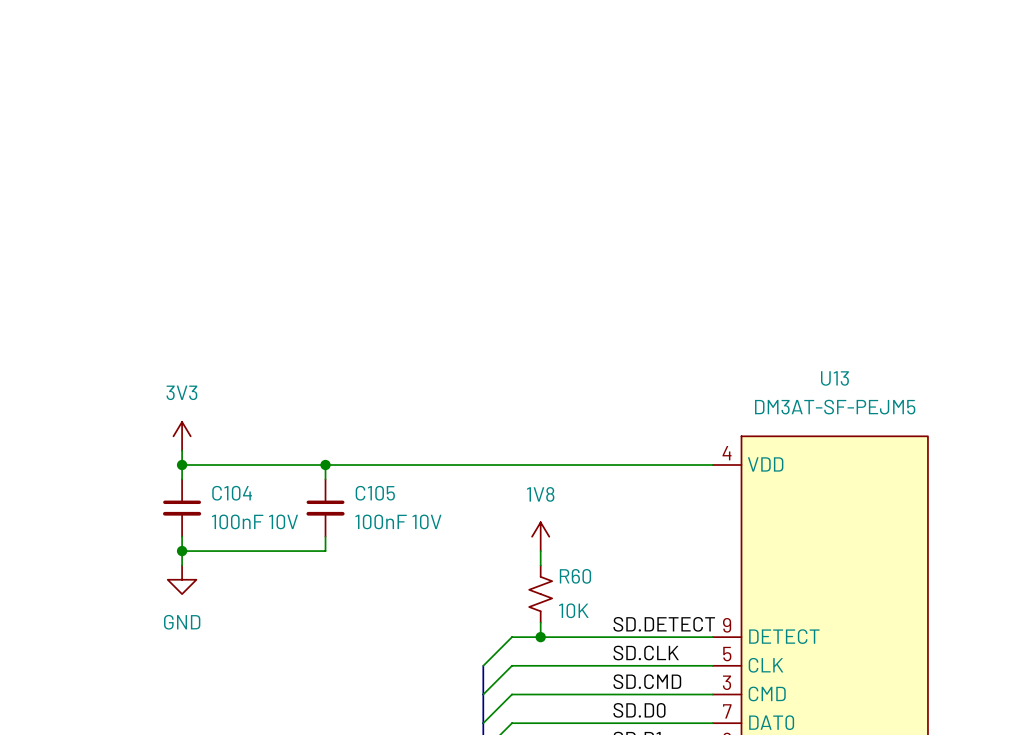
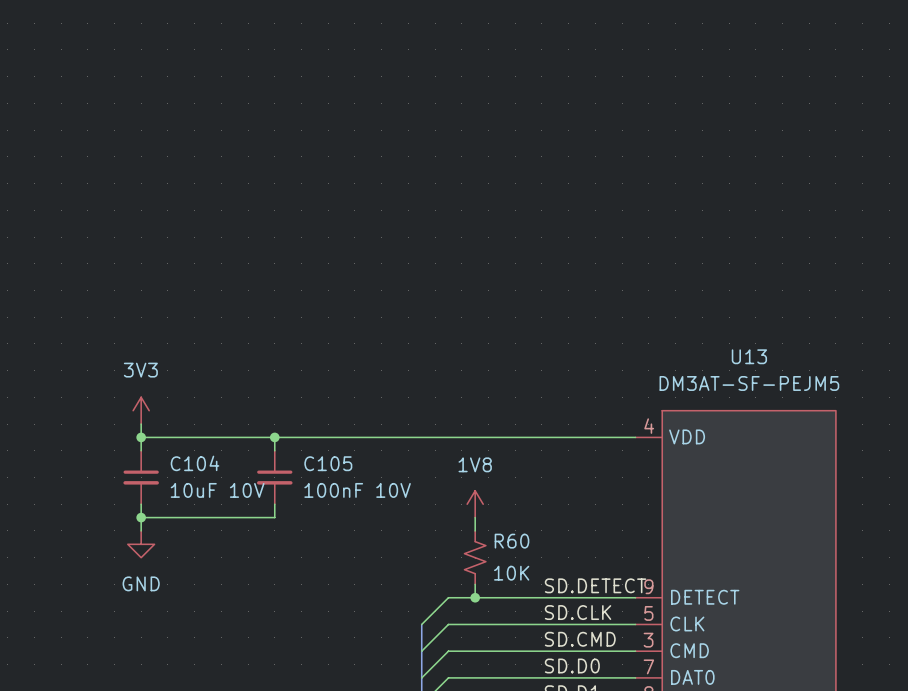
C104 value: 100nF 10V (254, 521) -> 10uF 10V (217, 490)

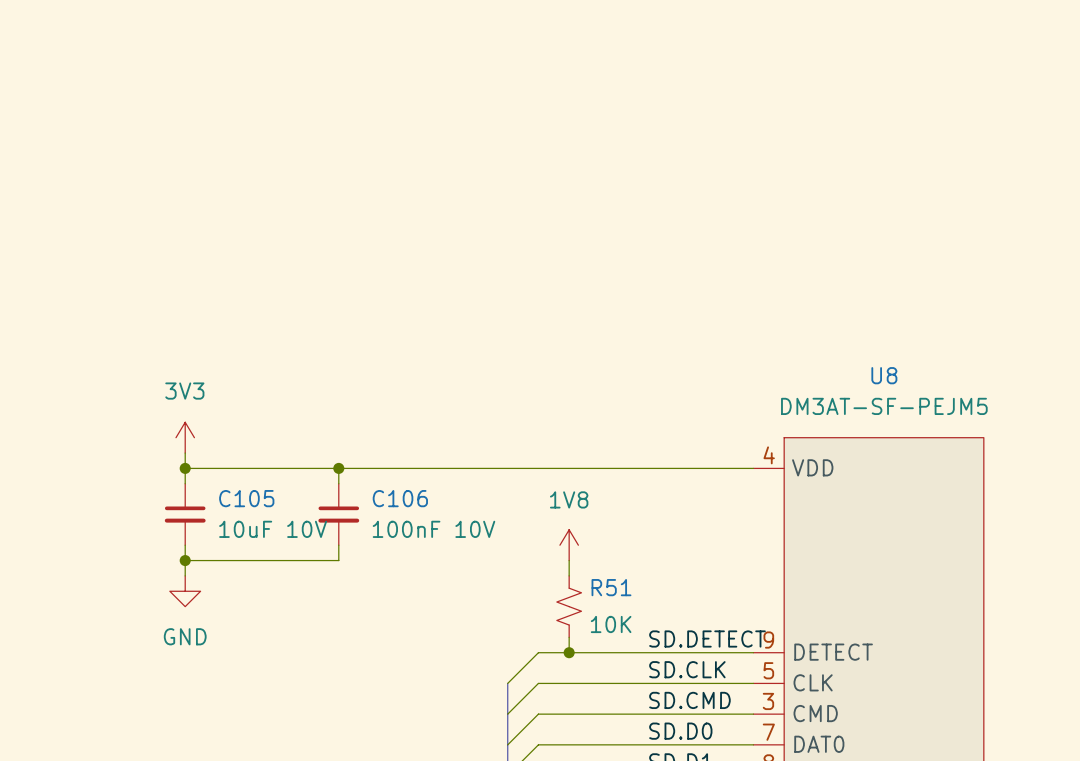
U13 name: U13 (749, 356) -> U8 (884, 375)
C104 name: C104 (195, 463) -> C105 (246, 498)
C105 name: C105 (328, 463) -> C106 (400, 498)
R60 name: R60 (511, 541) -> R51 (611, 587)

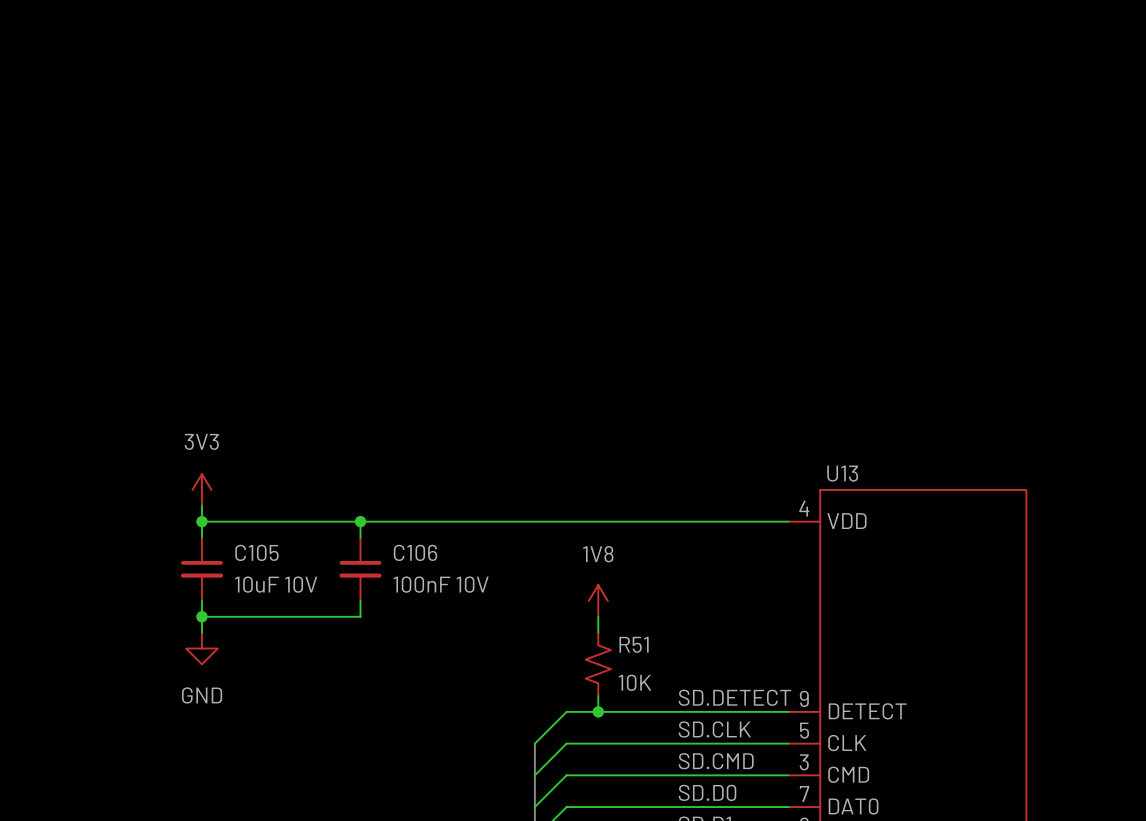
U8 name: U8 (884, 375) -> U13 (842, 473)
U8 value: DM3AT-SF-PEJM5 (884, 406) -> none

